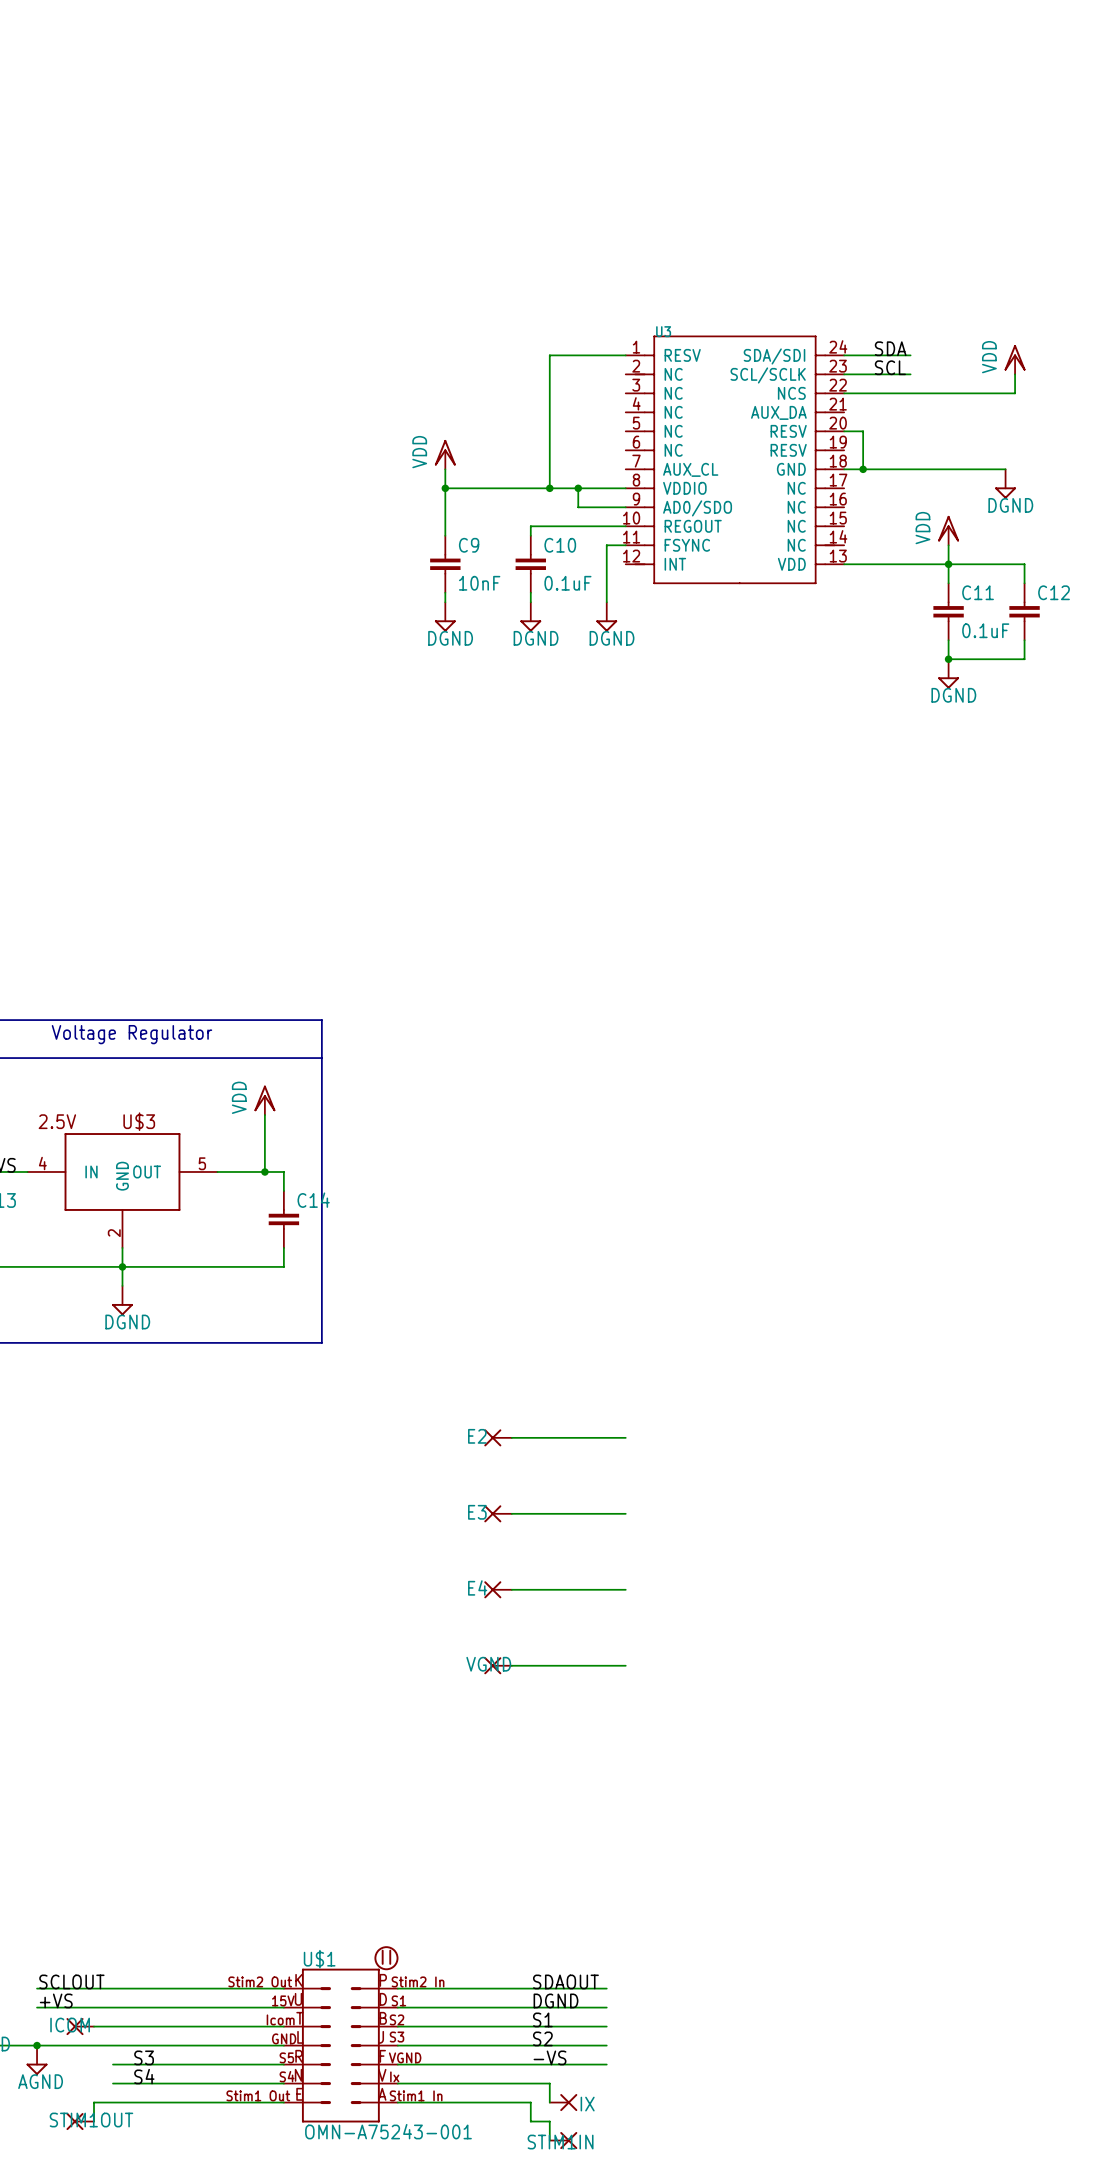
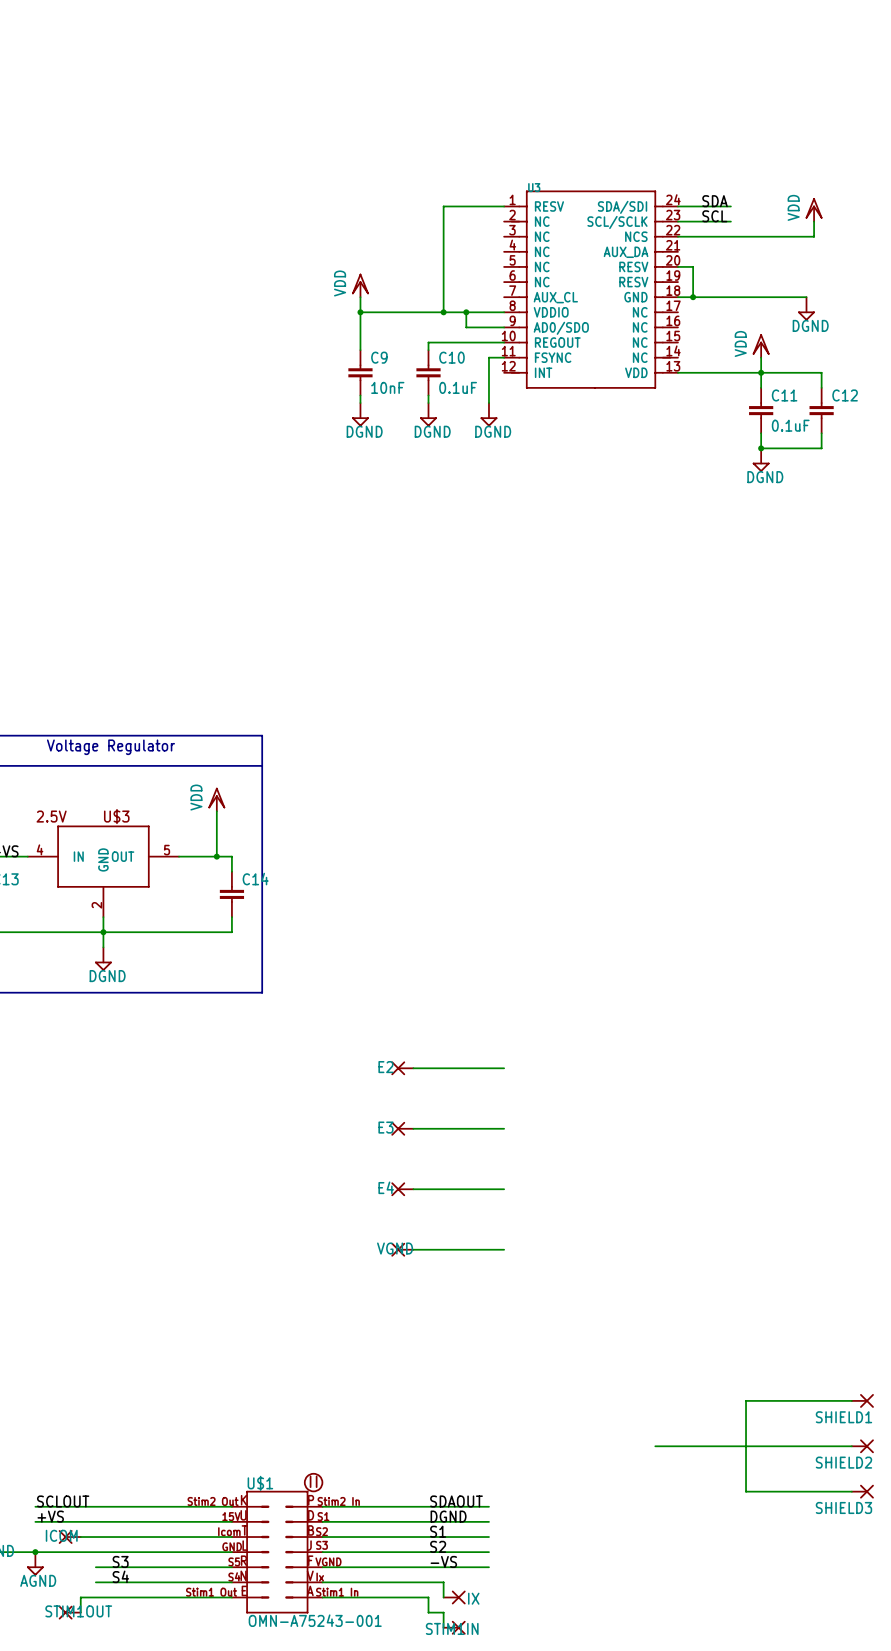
wire: none -> (851, 1400) (746, 1400) (746, 1491) (851, 1491)
SHIELD1: none -> (862, 1400)
wire: none -> (655, 1446) (851, 1446)
SHIELD2: none -> (862, 1446)
SHIELD3: none -> (862, 1491)

